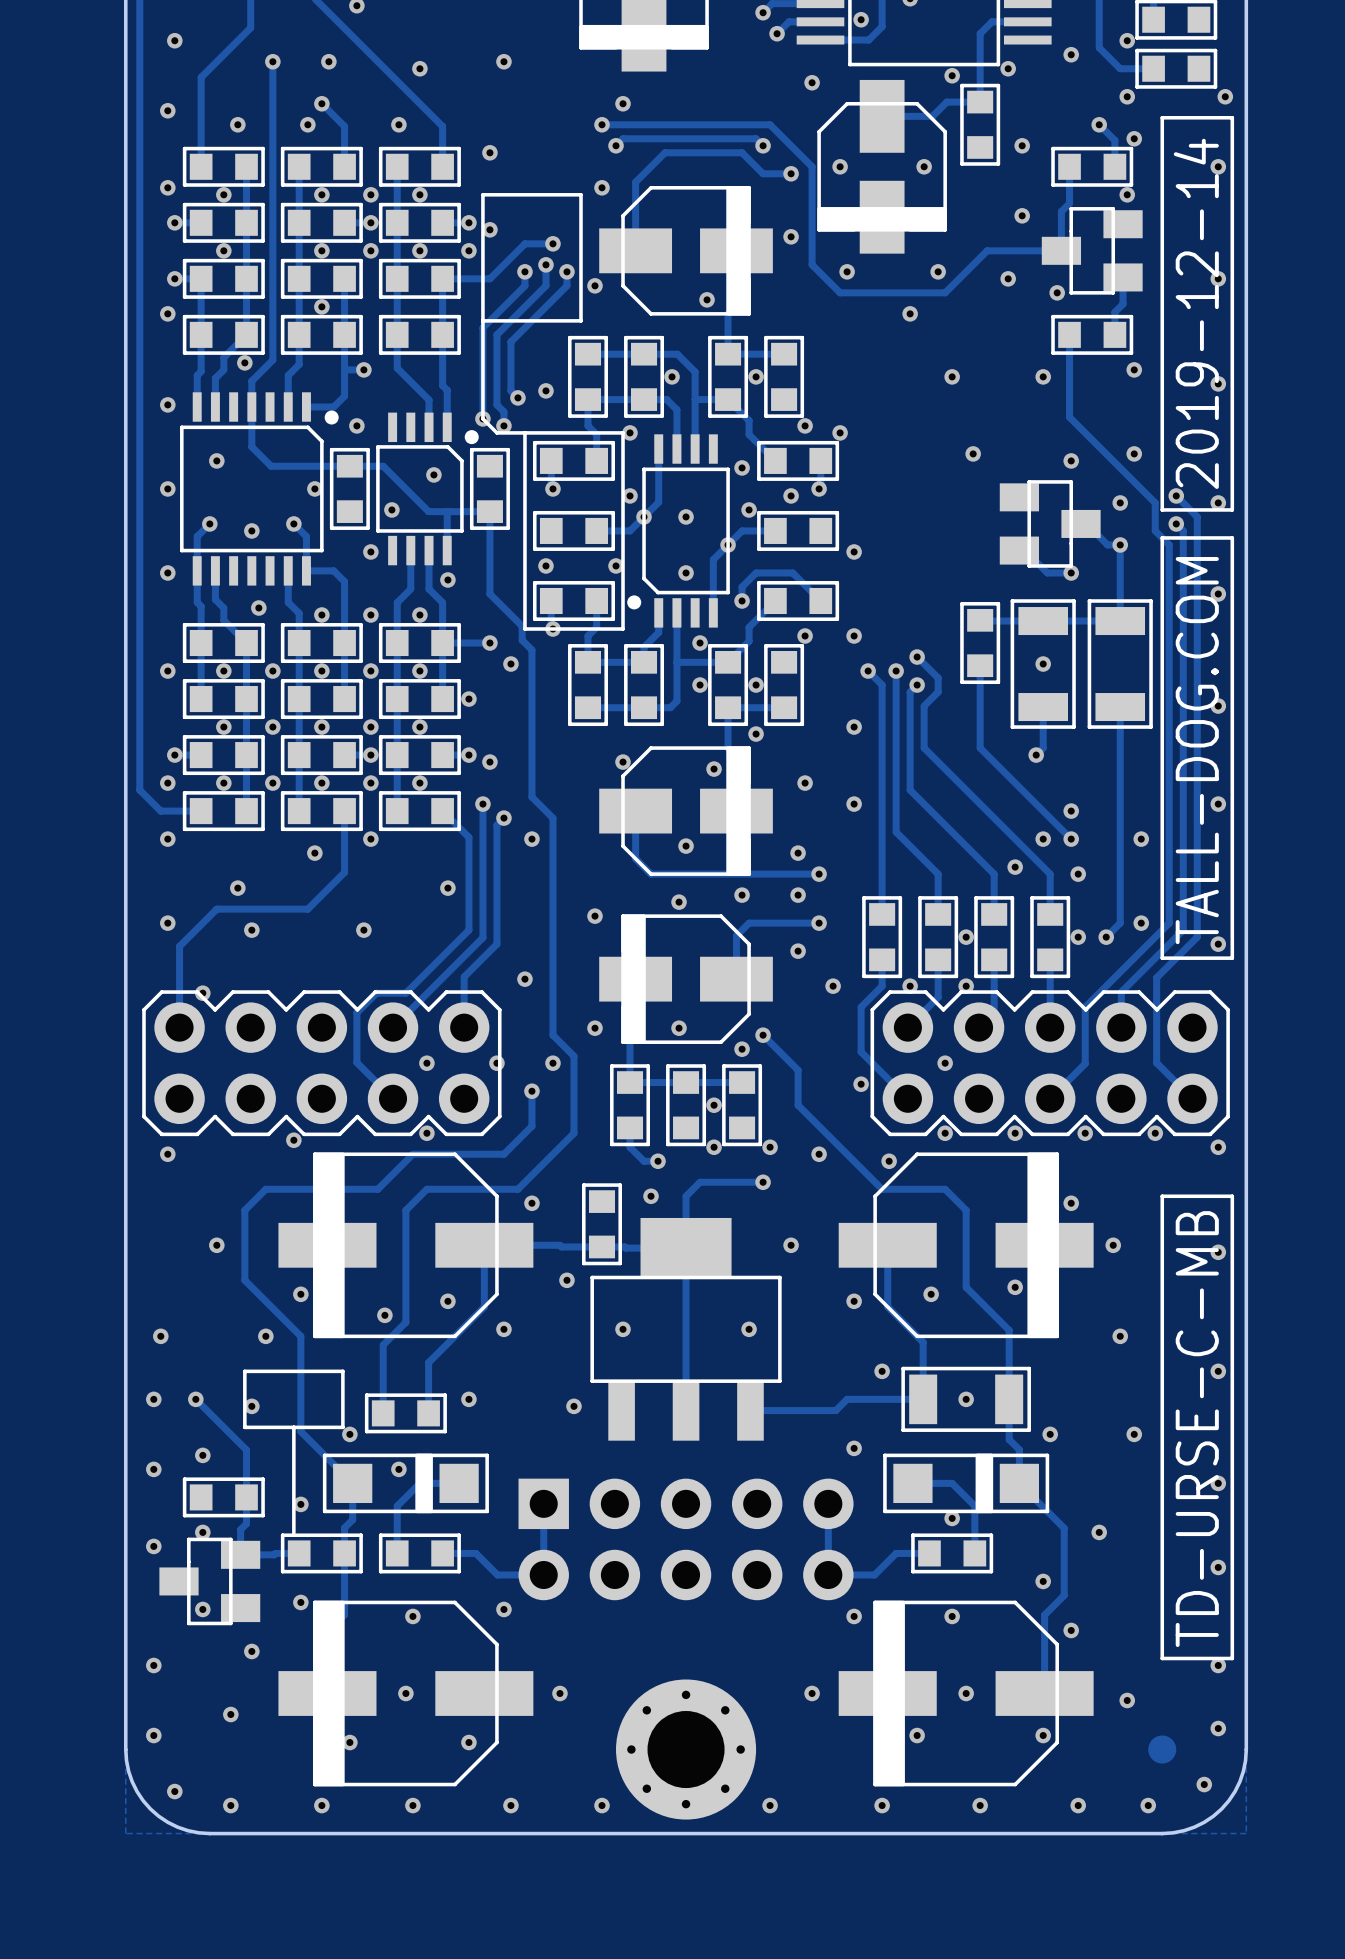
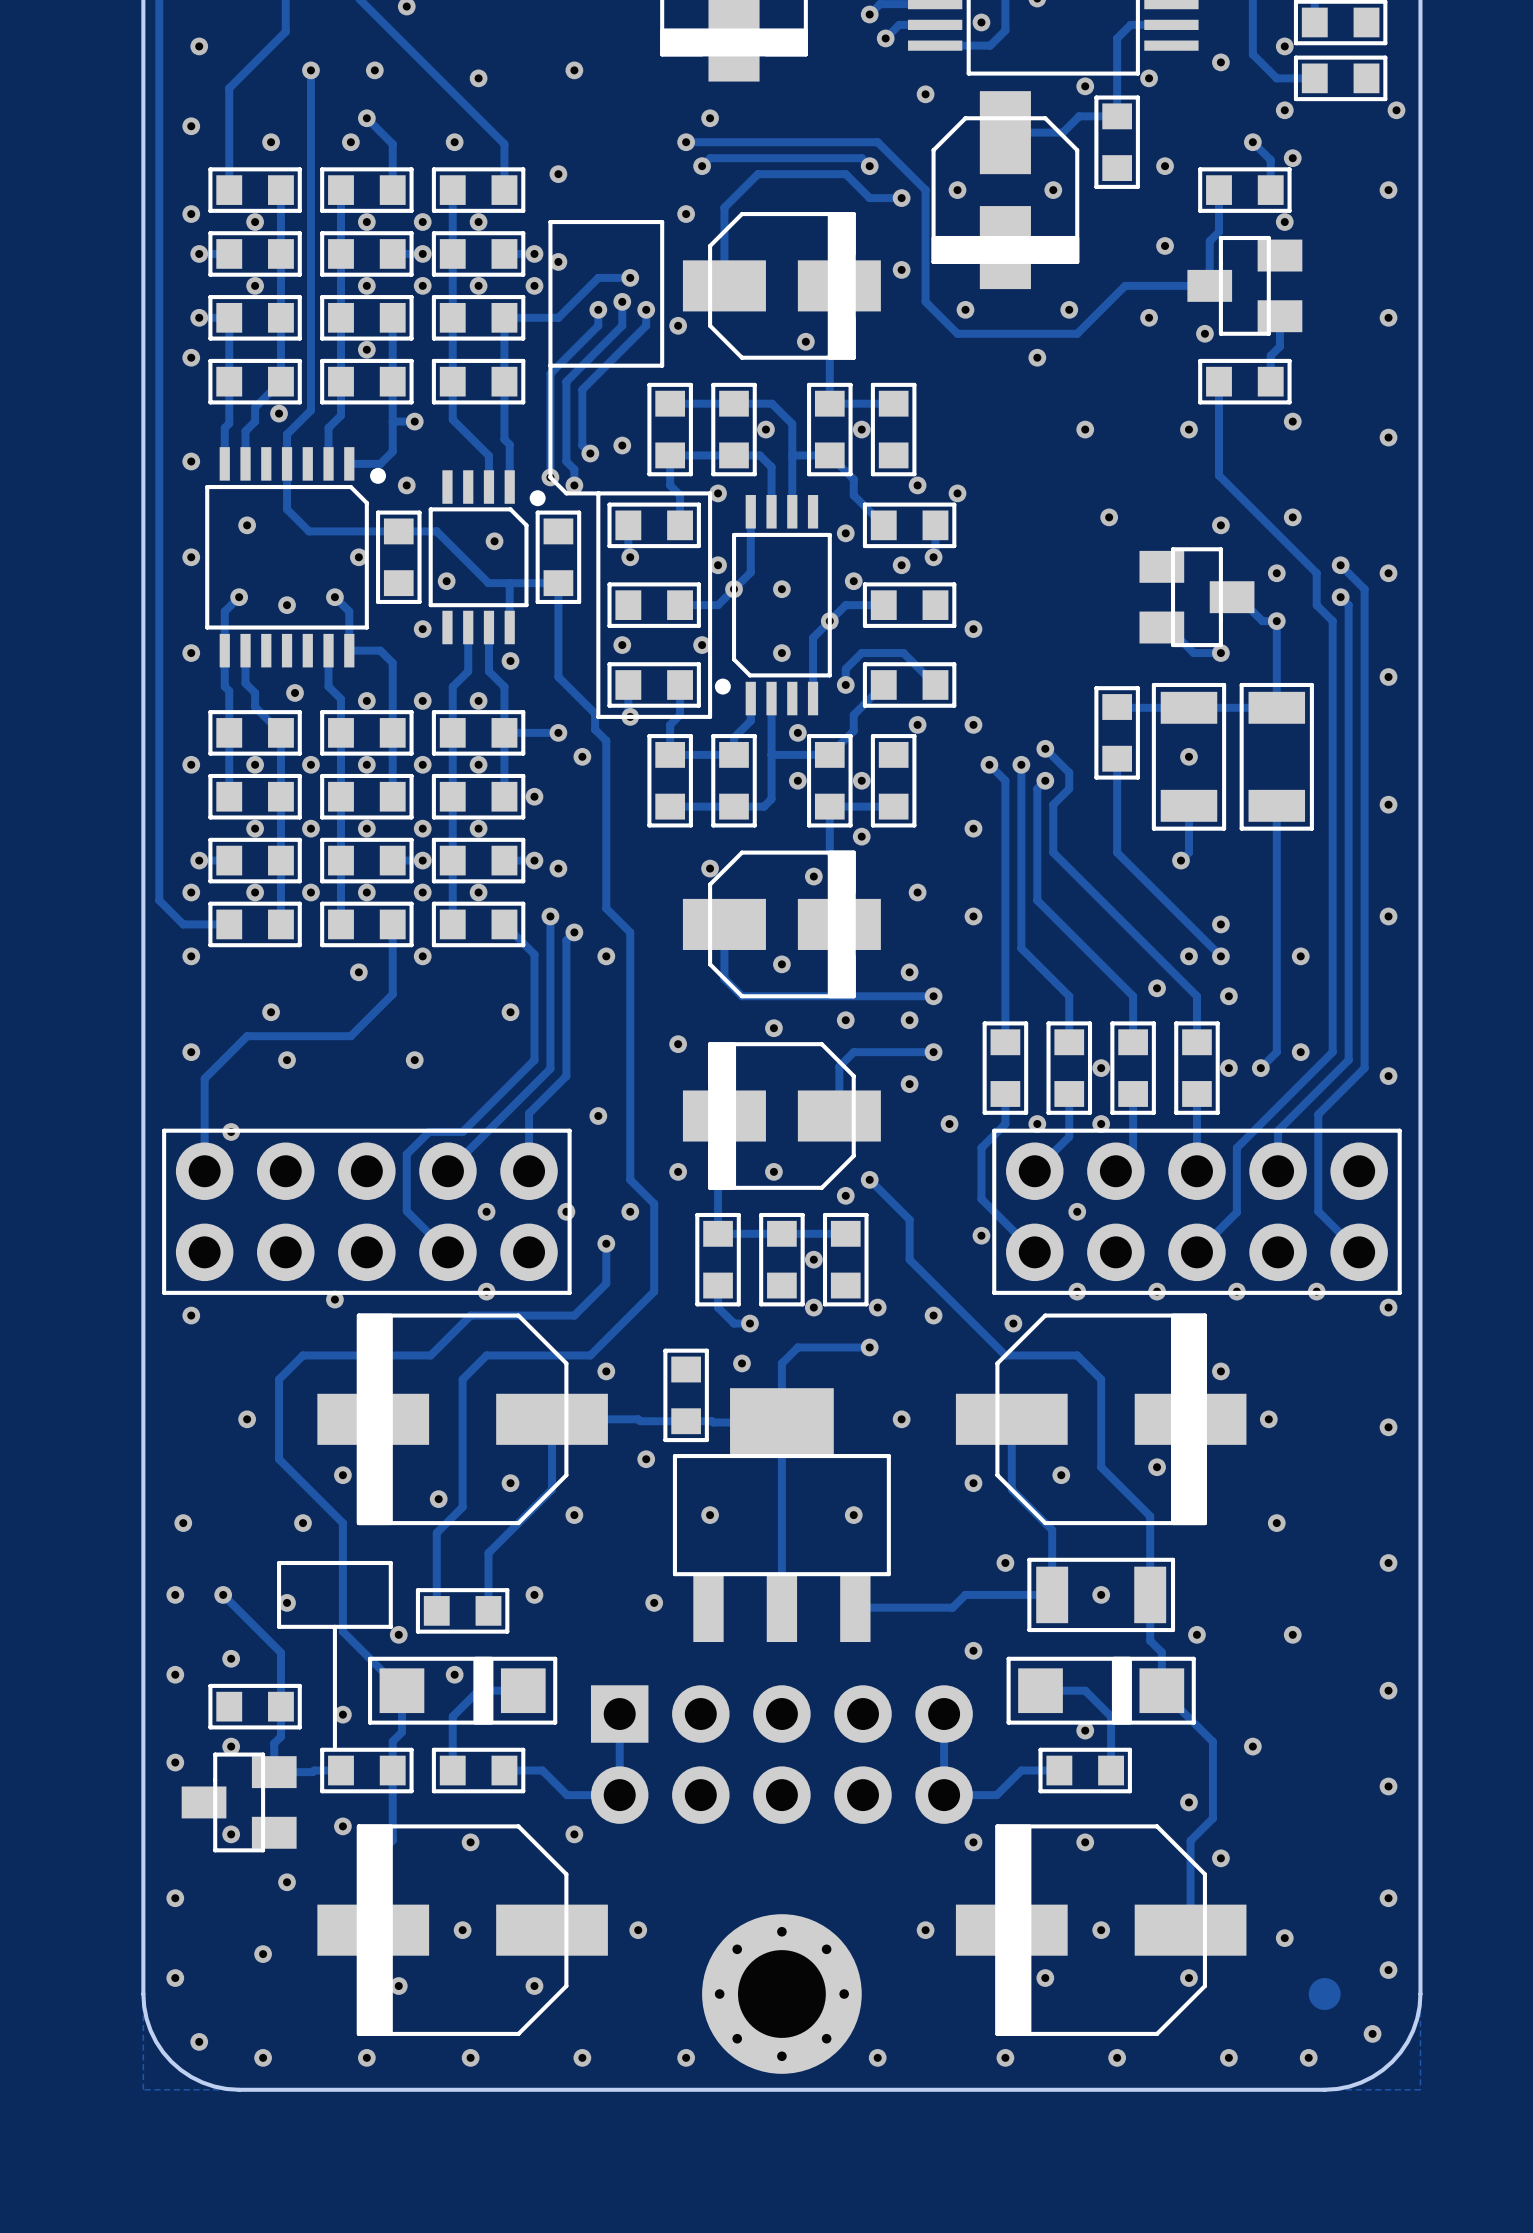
line: (1162, 117) (1162, 509) (1232, 509) (1232, 117) (1162, 117) -> none
text: 2019-12-14 (1196, 313) -> none
line: (1162, 537) (1162, 958) (1232, 958) (1232, 537) (1162, 537) -> none
text: TALL-DOG.COM (1197, 750) -> none
part footprint: [142, 990, 502, 1137] -> [162, 1128, 572, 1295]
part footprint: [870, 990, 1230, 1137] -> [992, 1128, 1402, 1295]
line: (1162, 1196) (1162, 1658) (1232, 1658) (1232, 1196) (1162, 1196) -> none
text: TD-URSE-C-MB (1197, 1429) -> none

